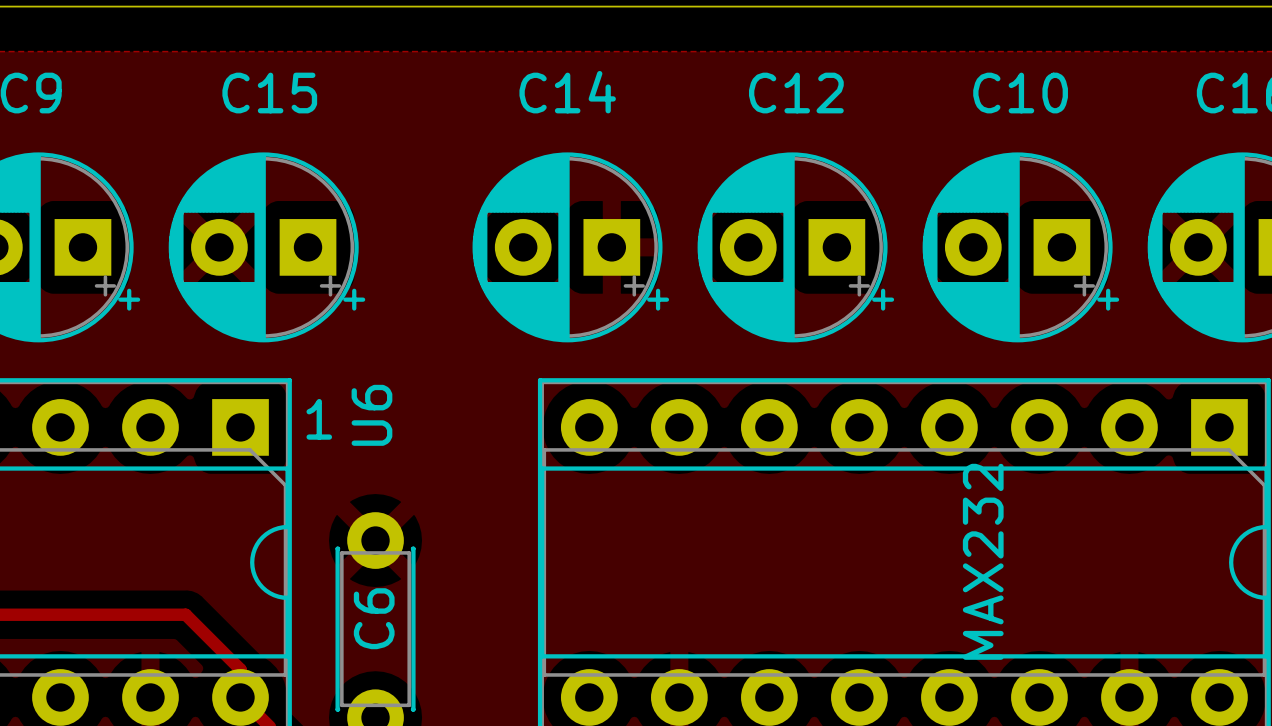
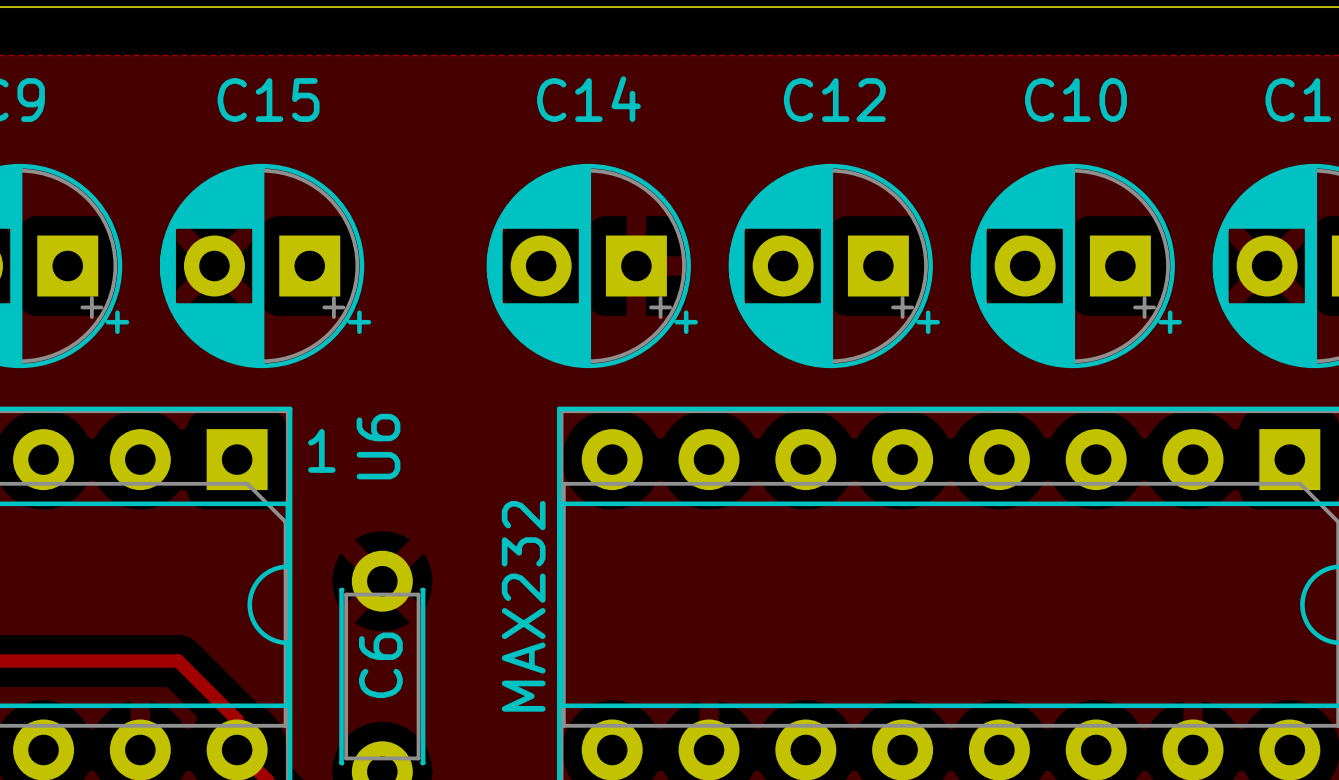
text: MAX232 (983, 561) -> none
text: none -> MAX232 (523, 606)

